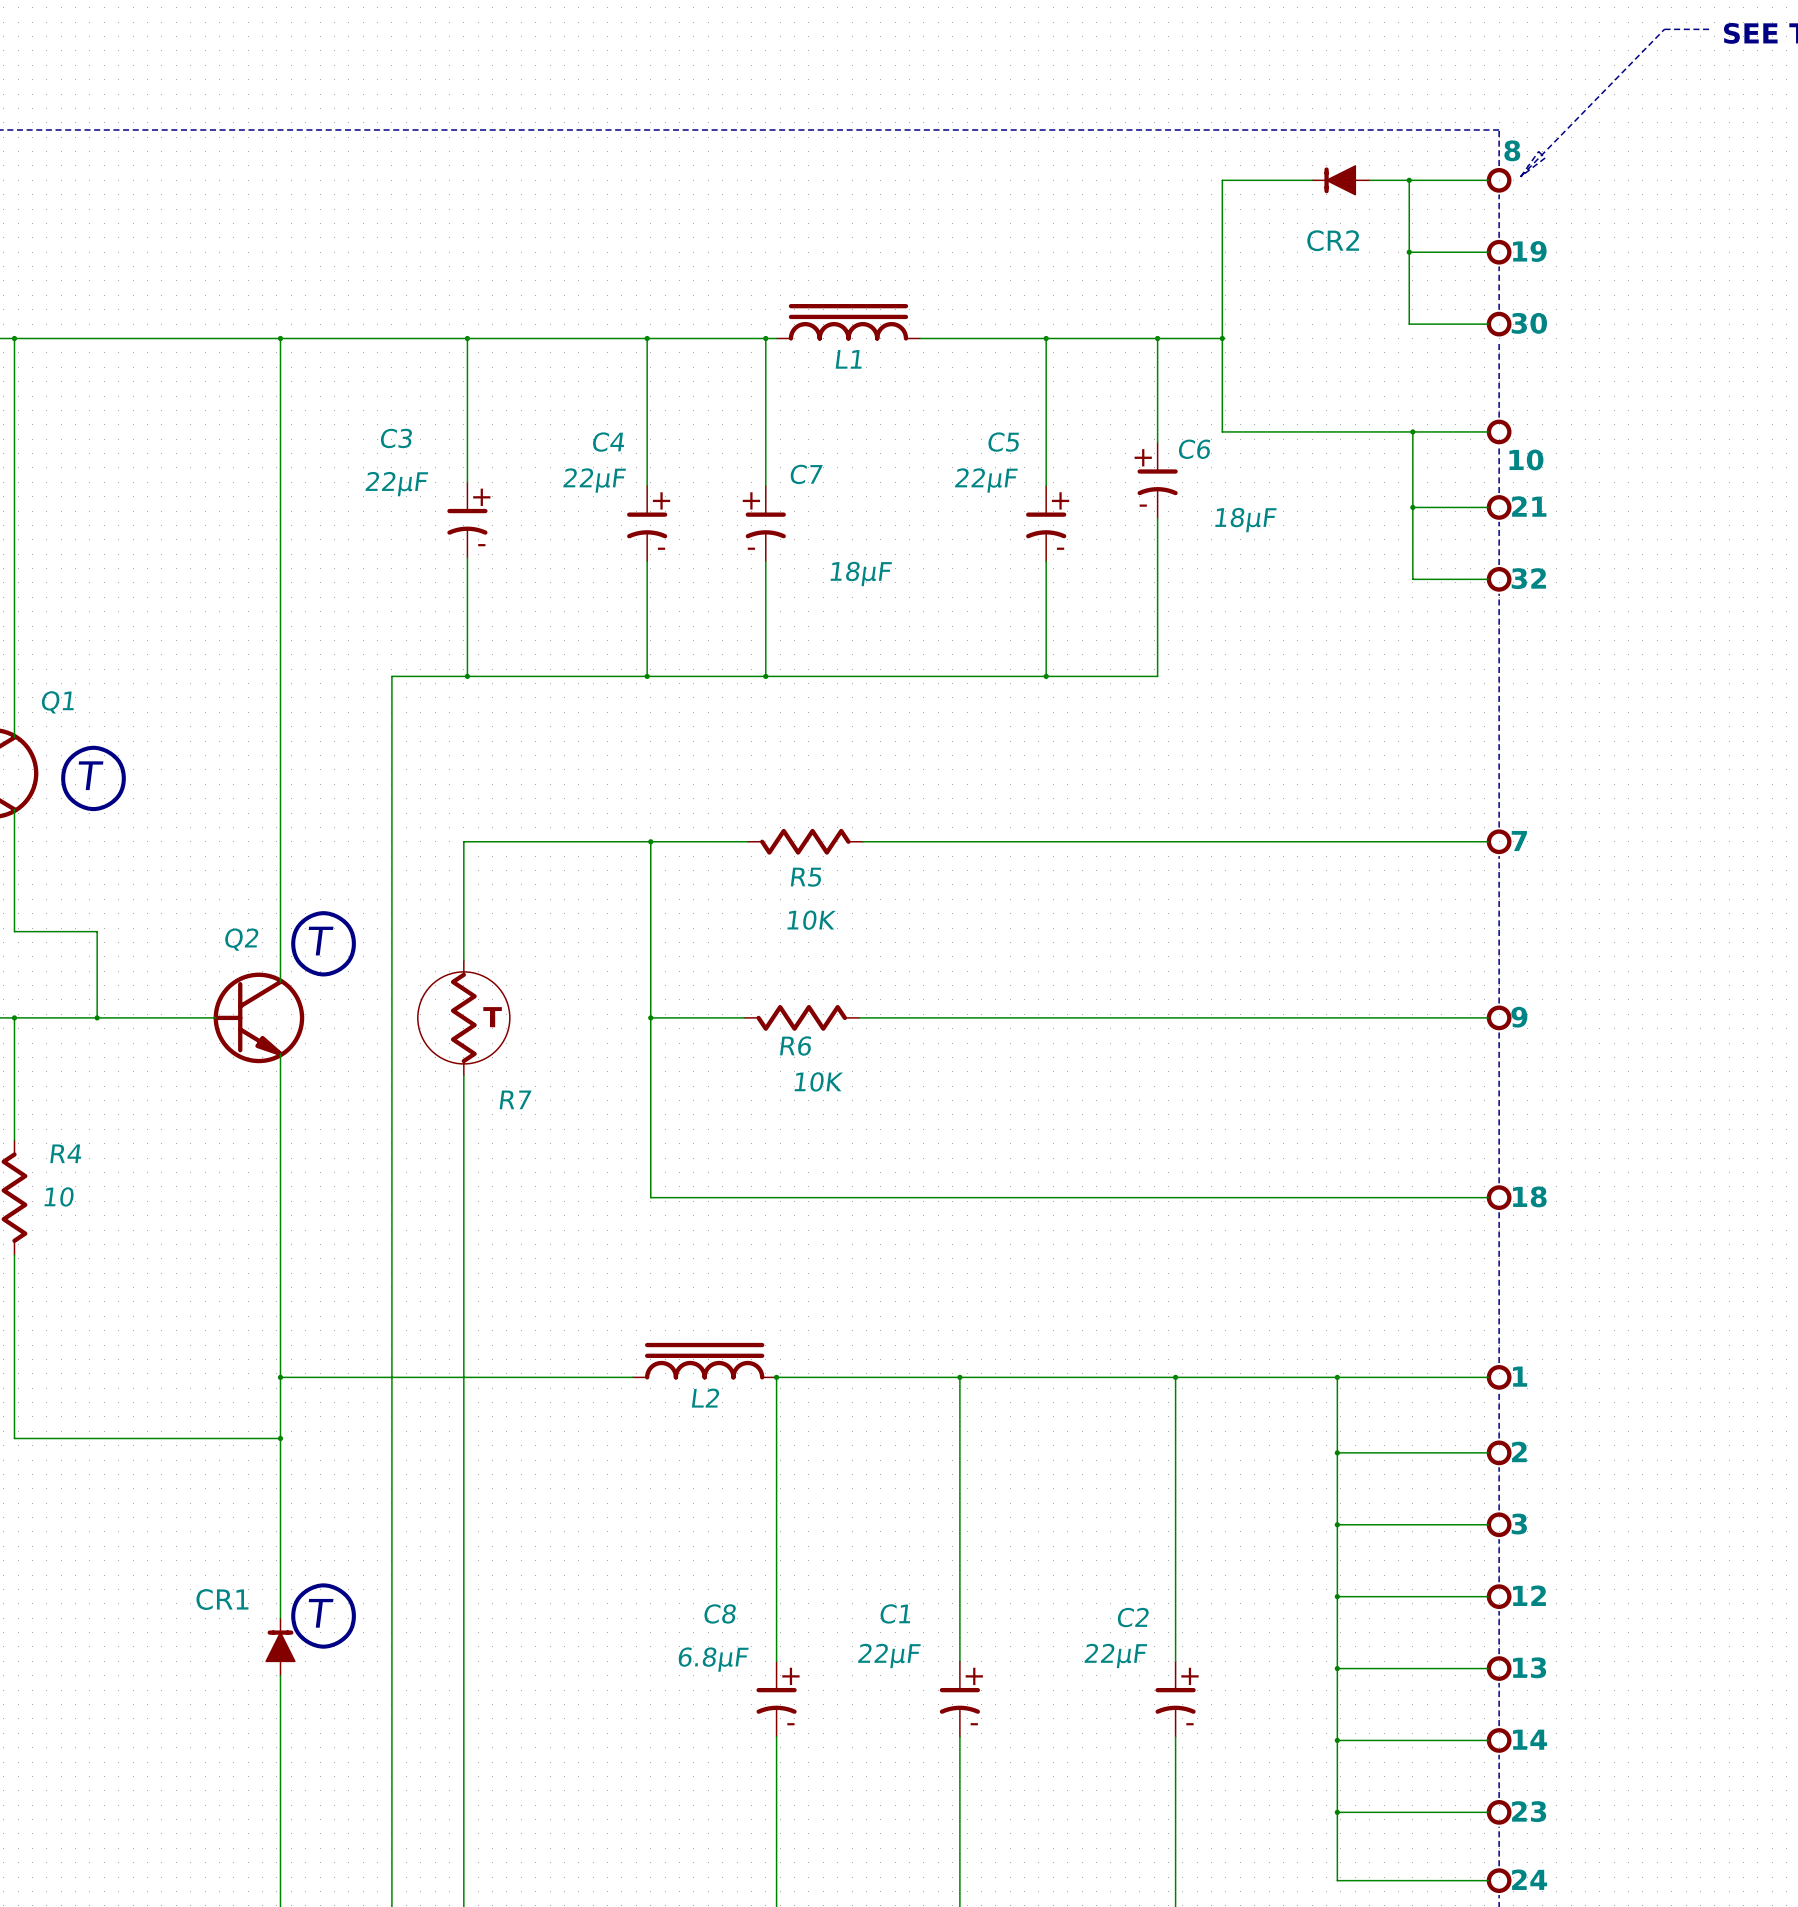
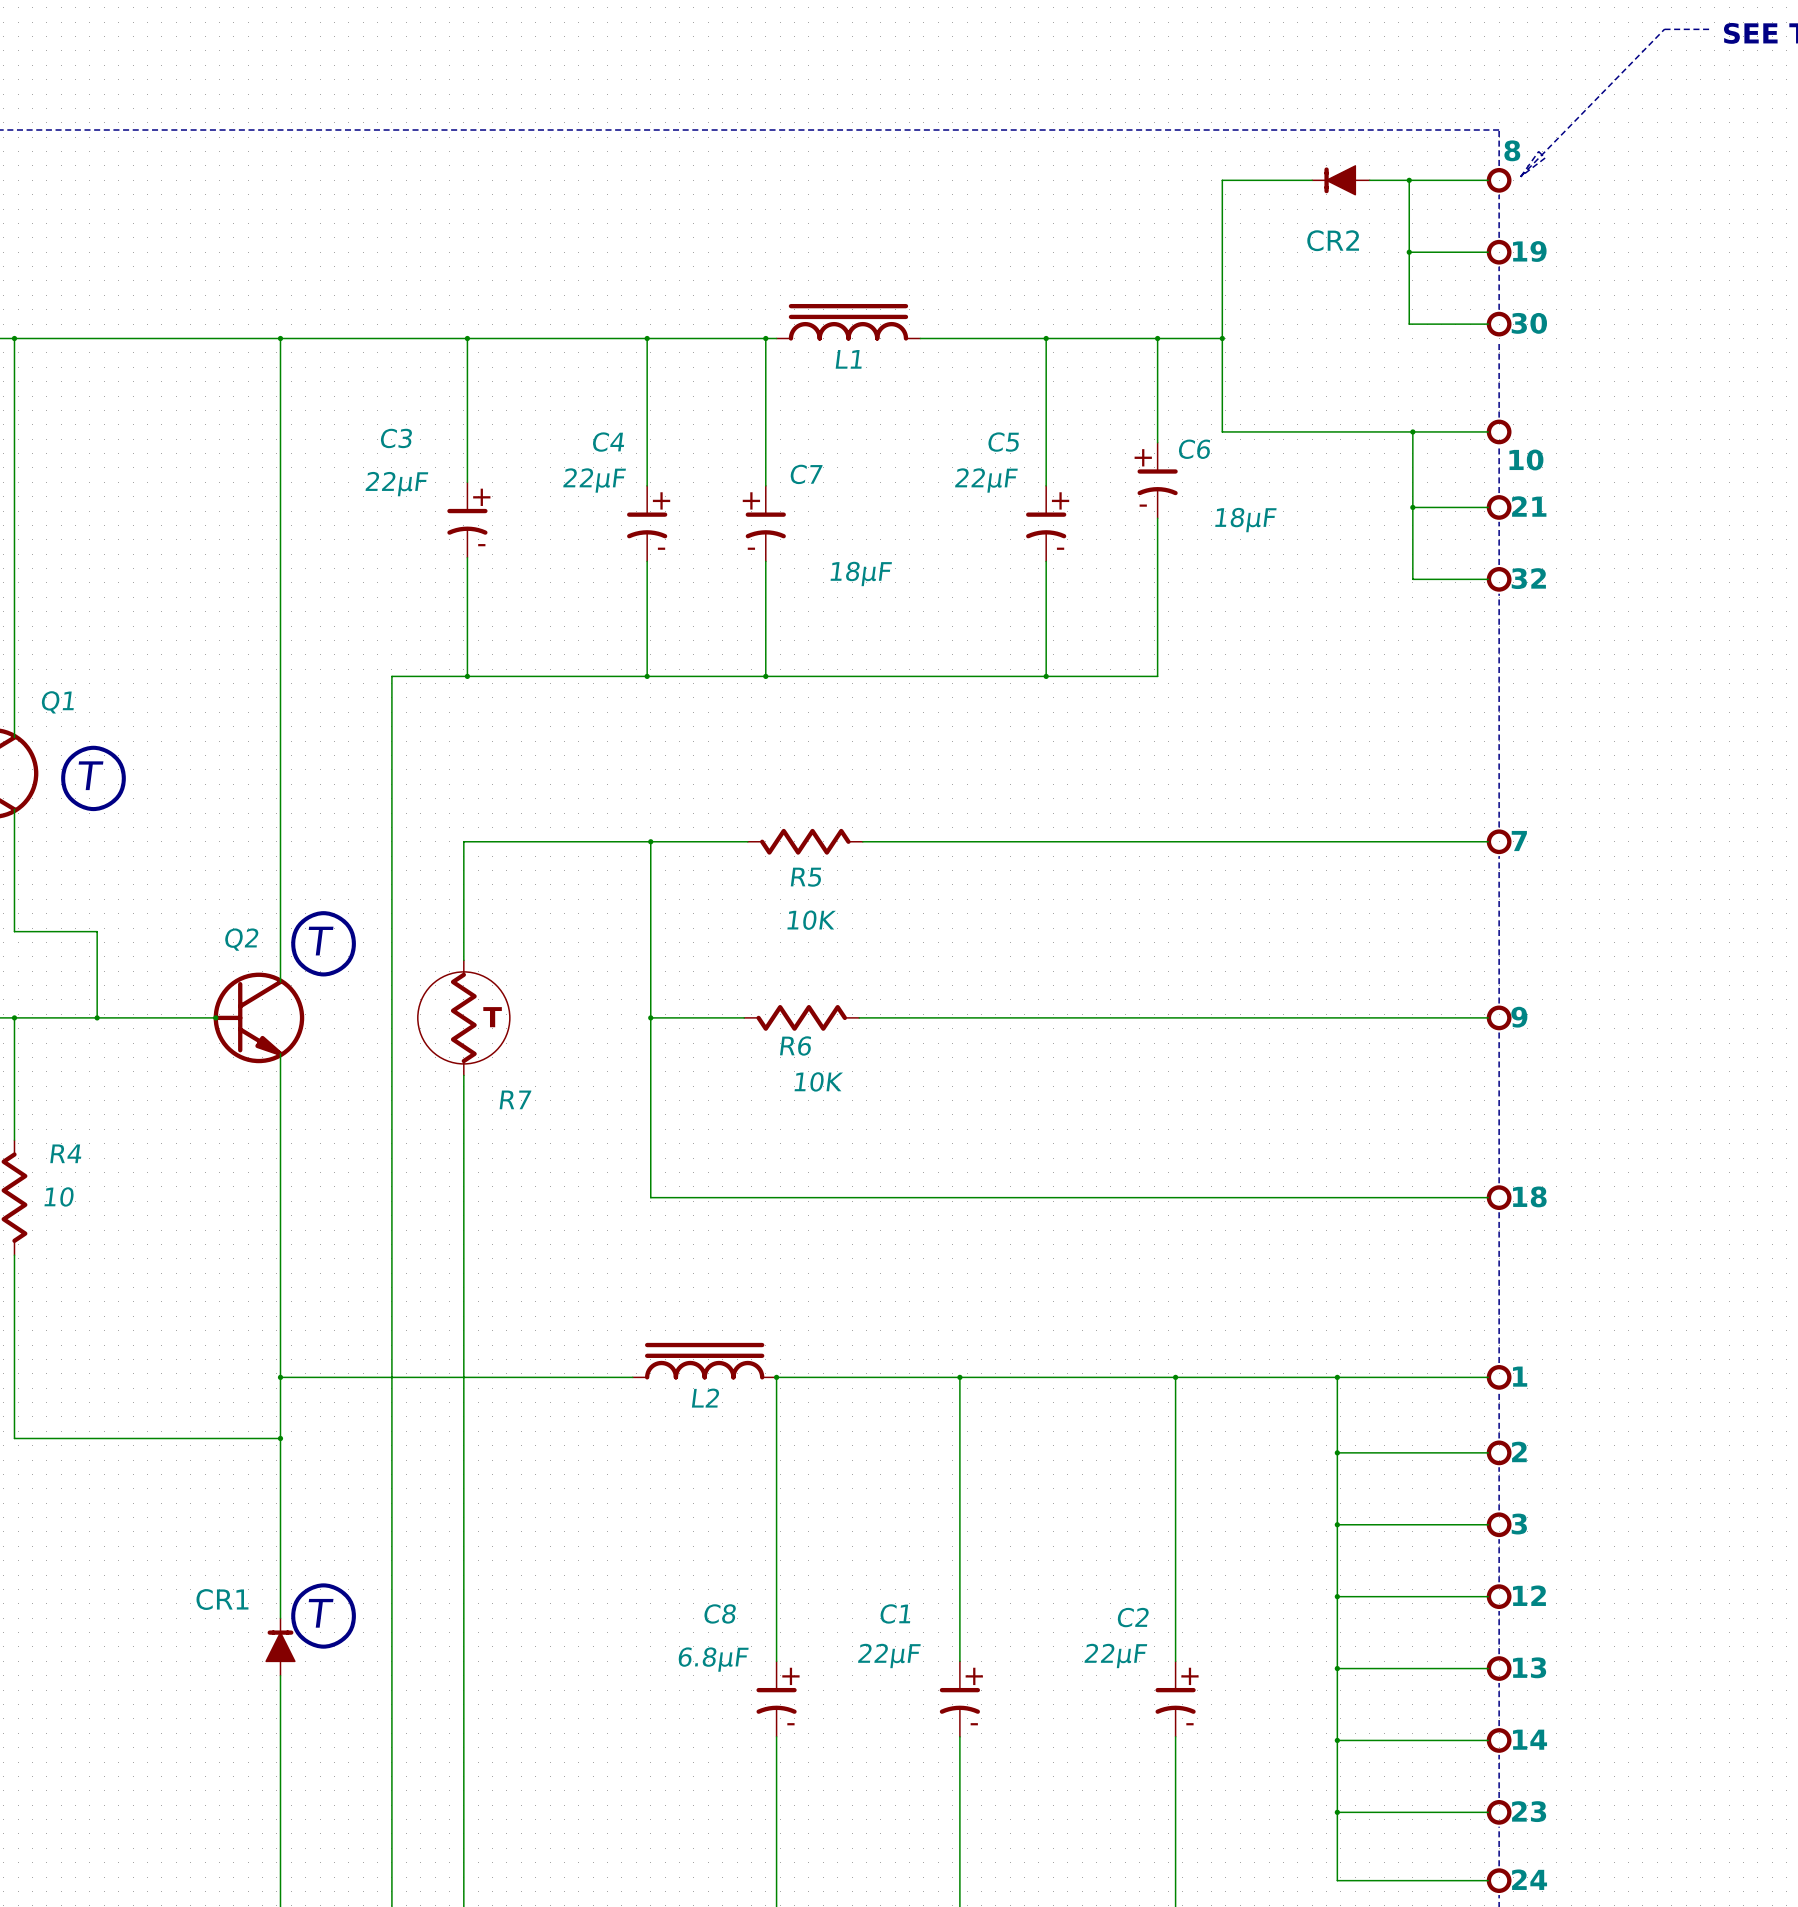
junction: none -> (215, 1017)

